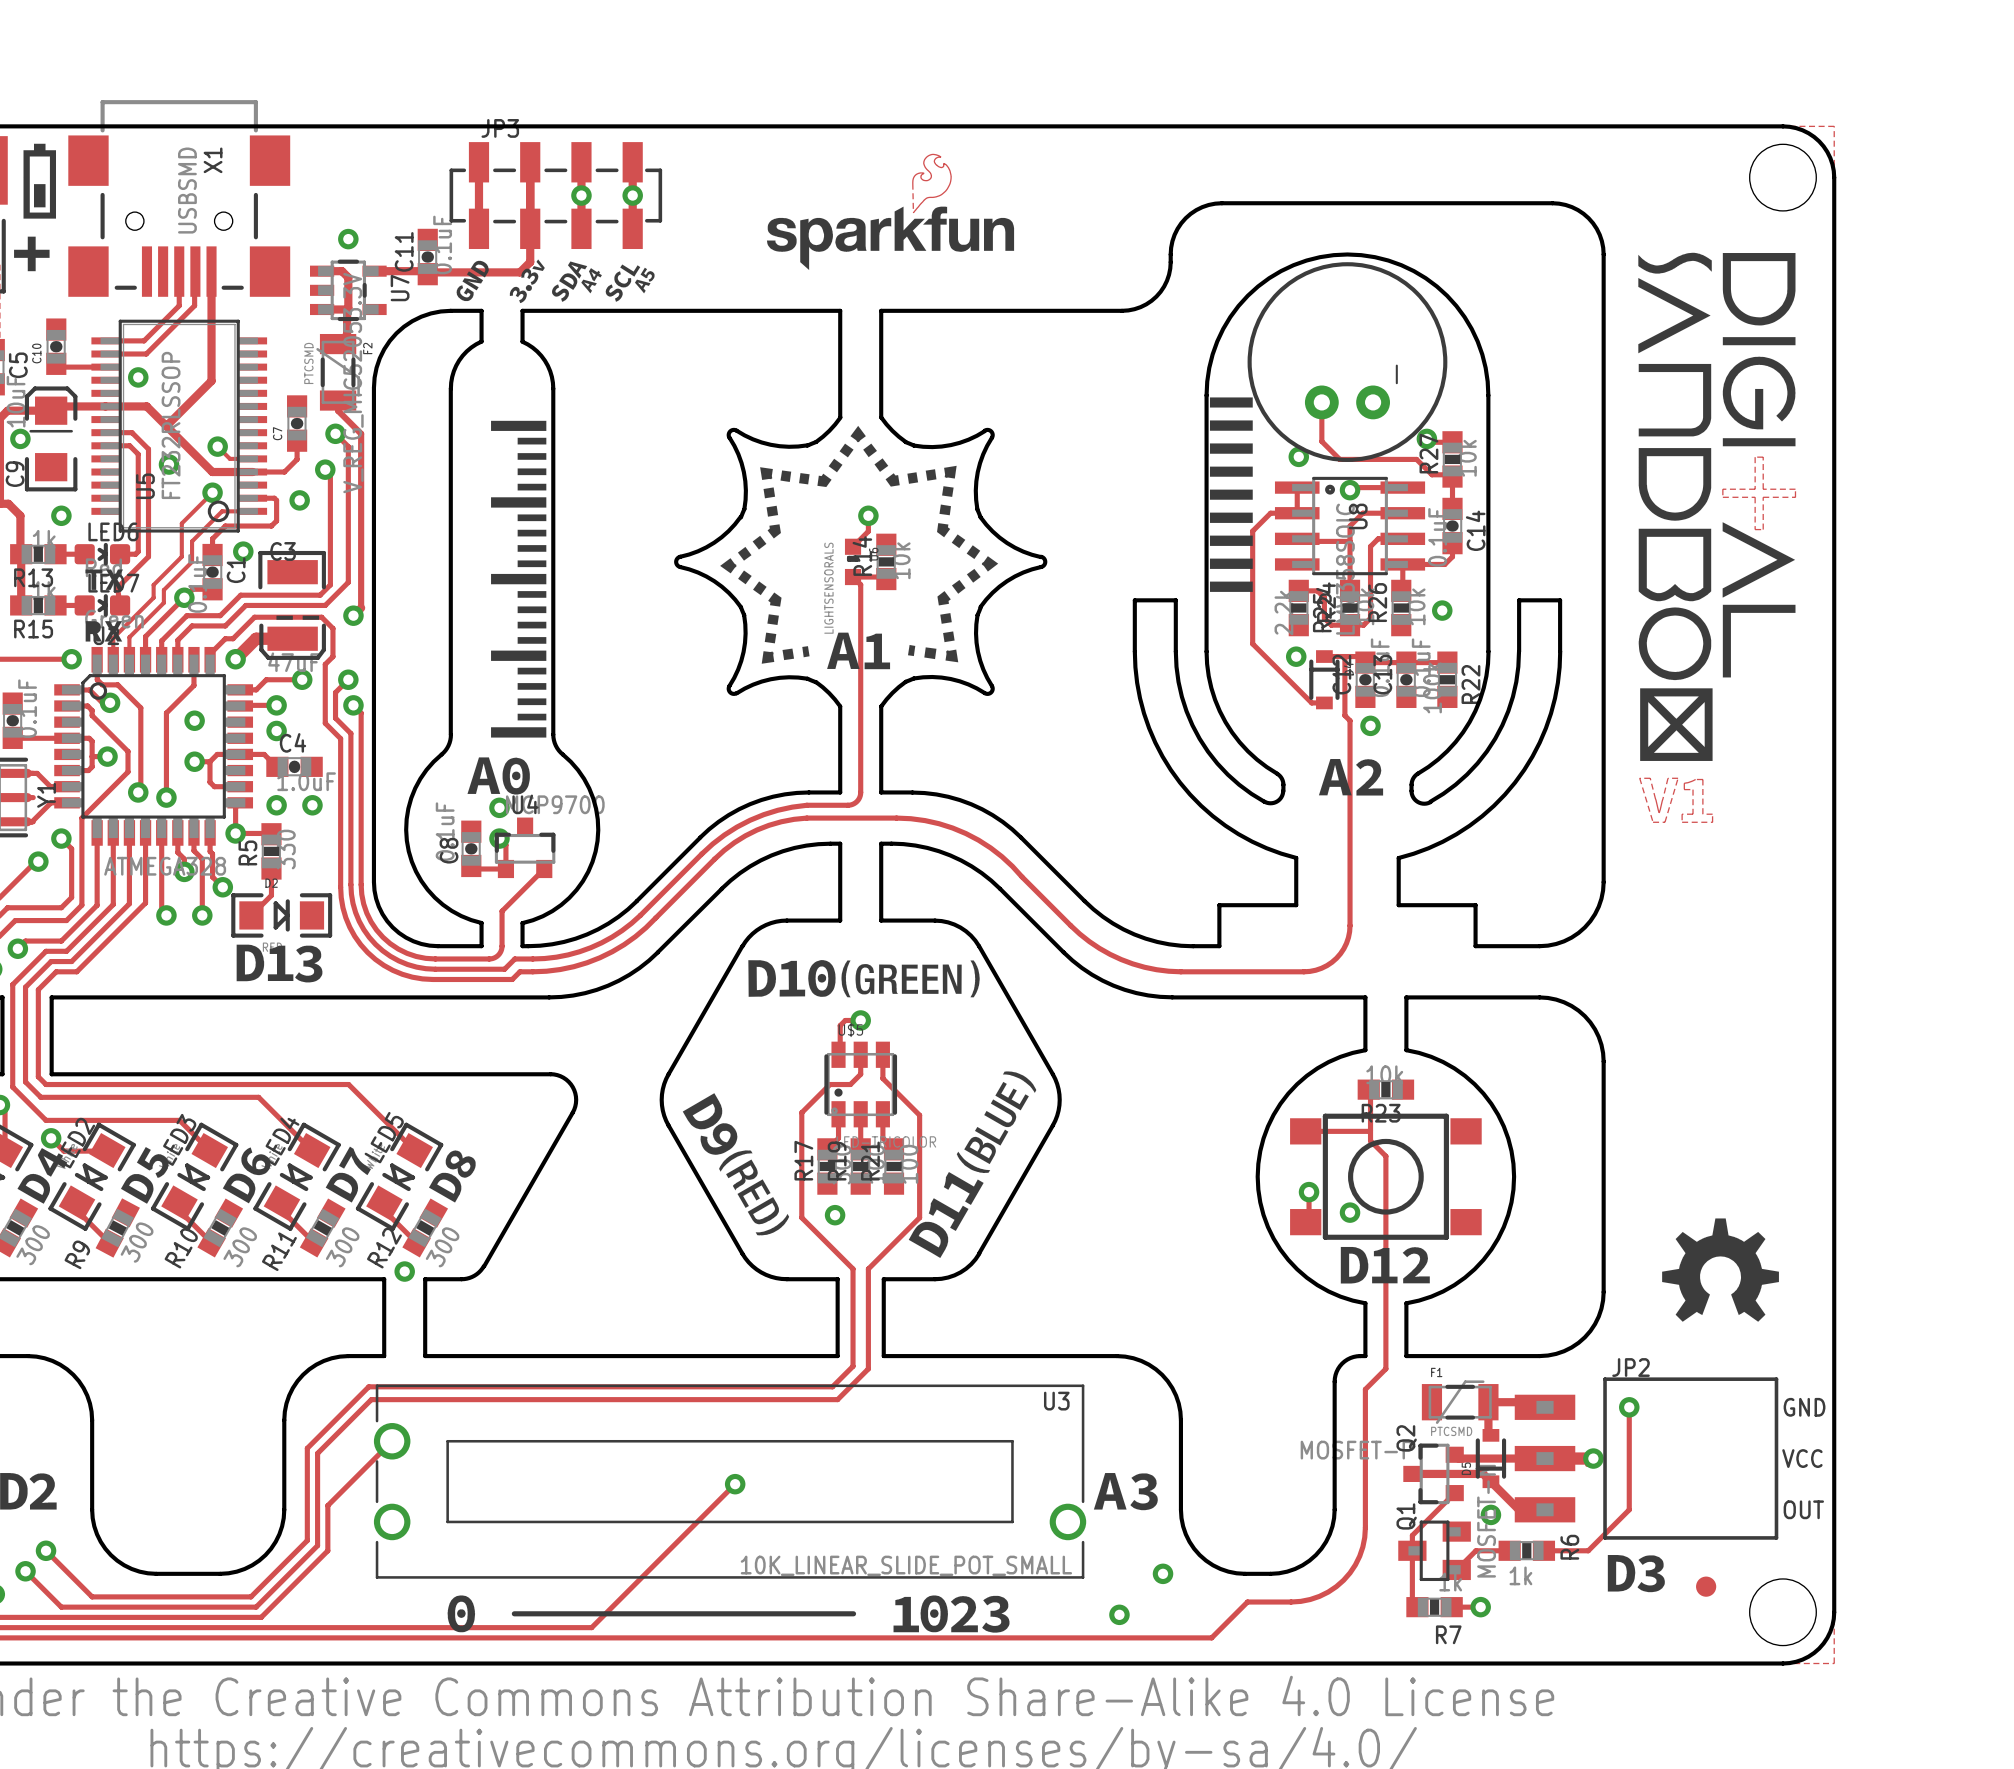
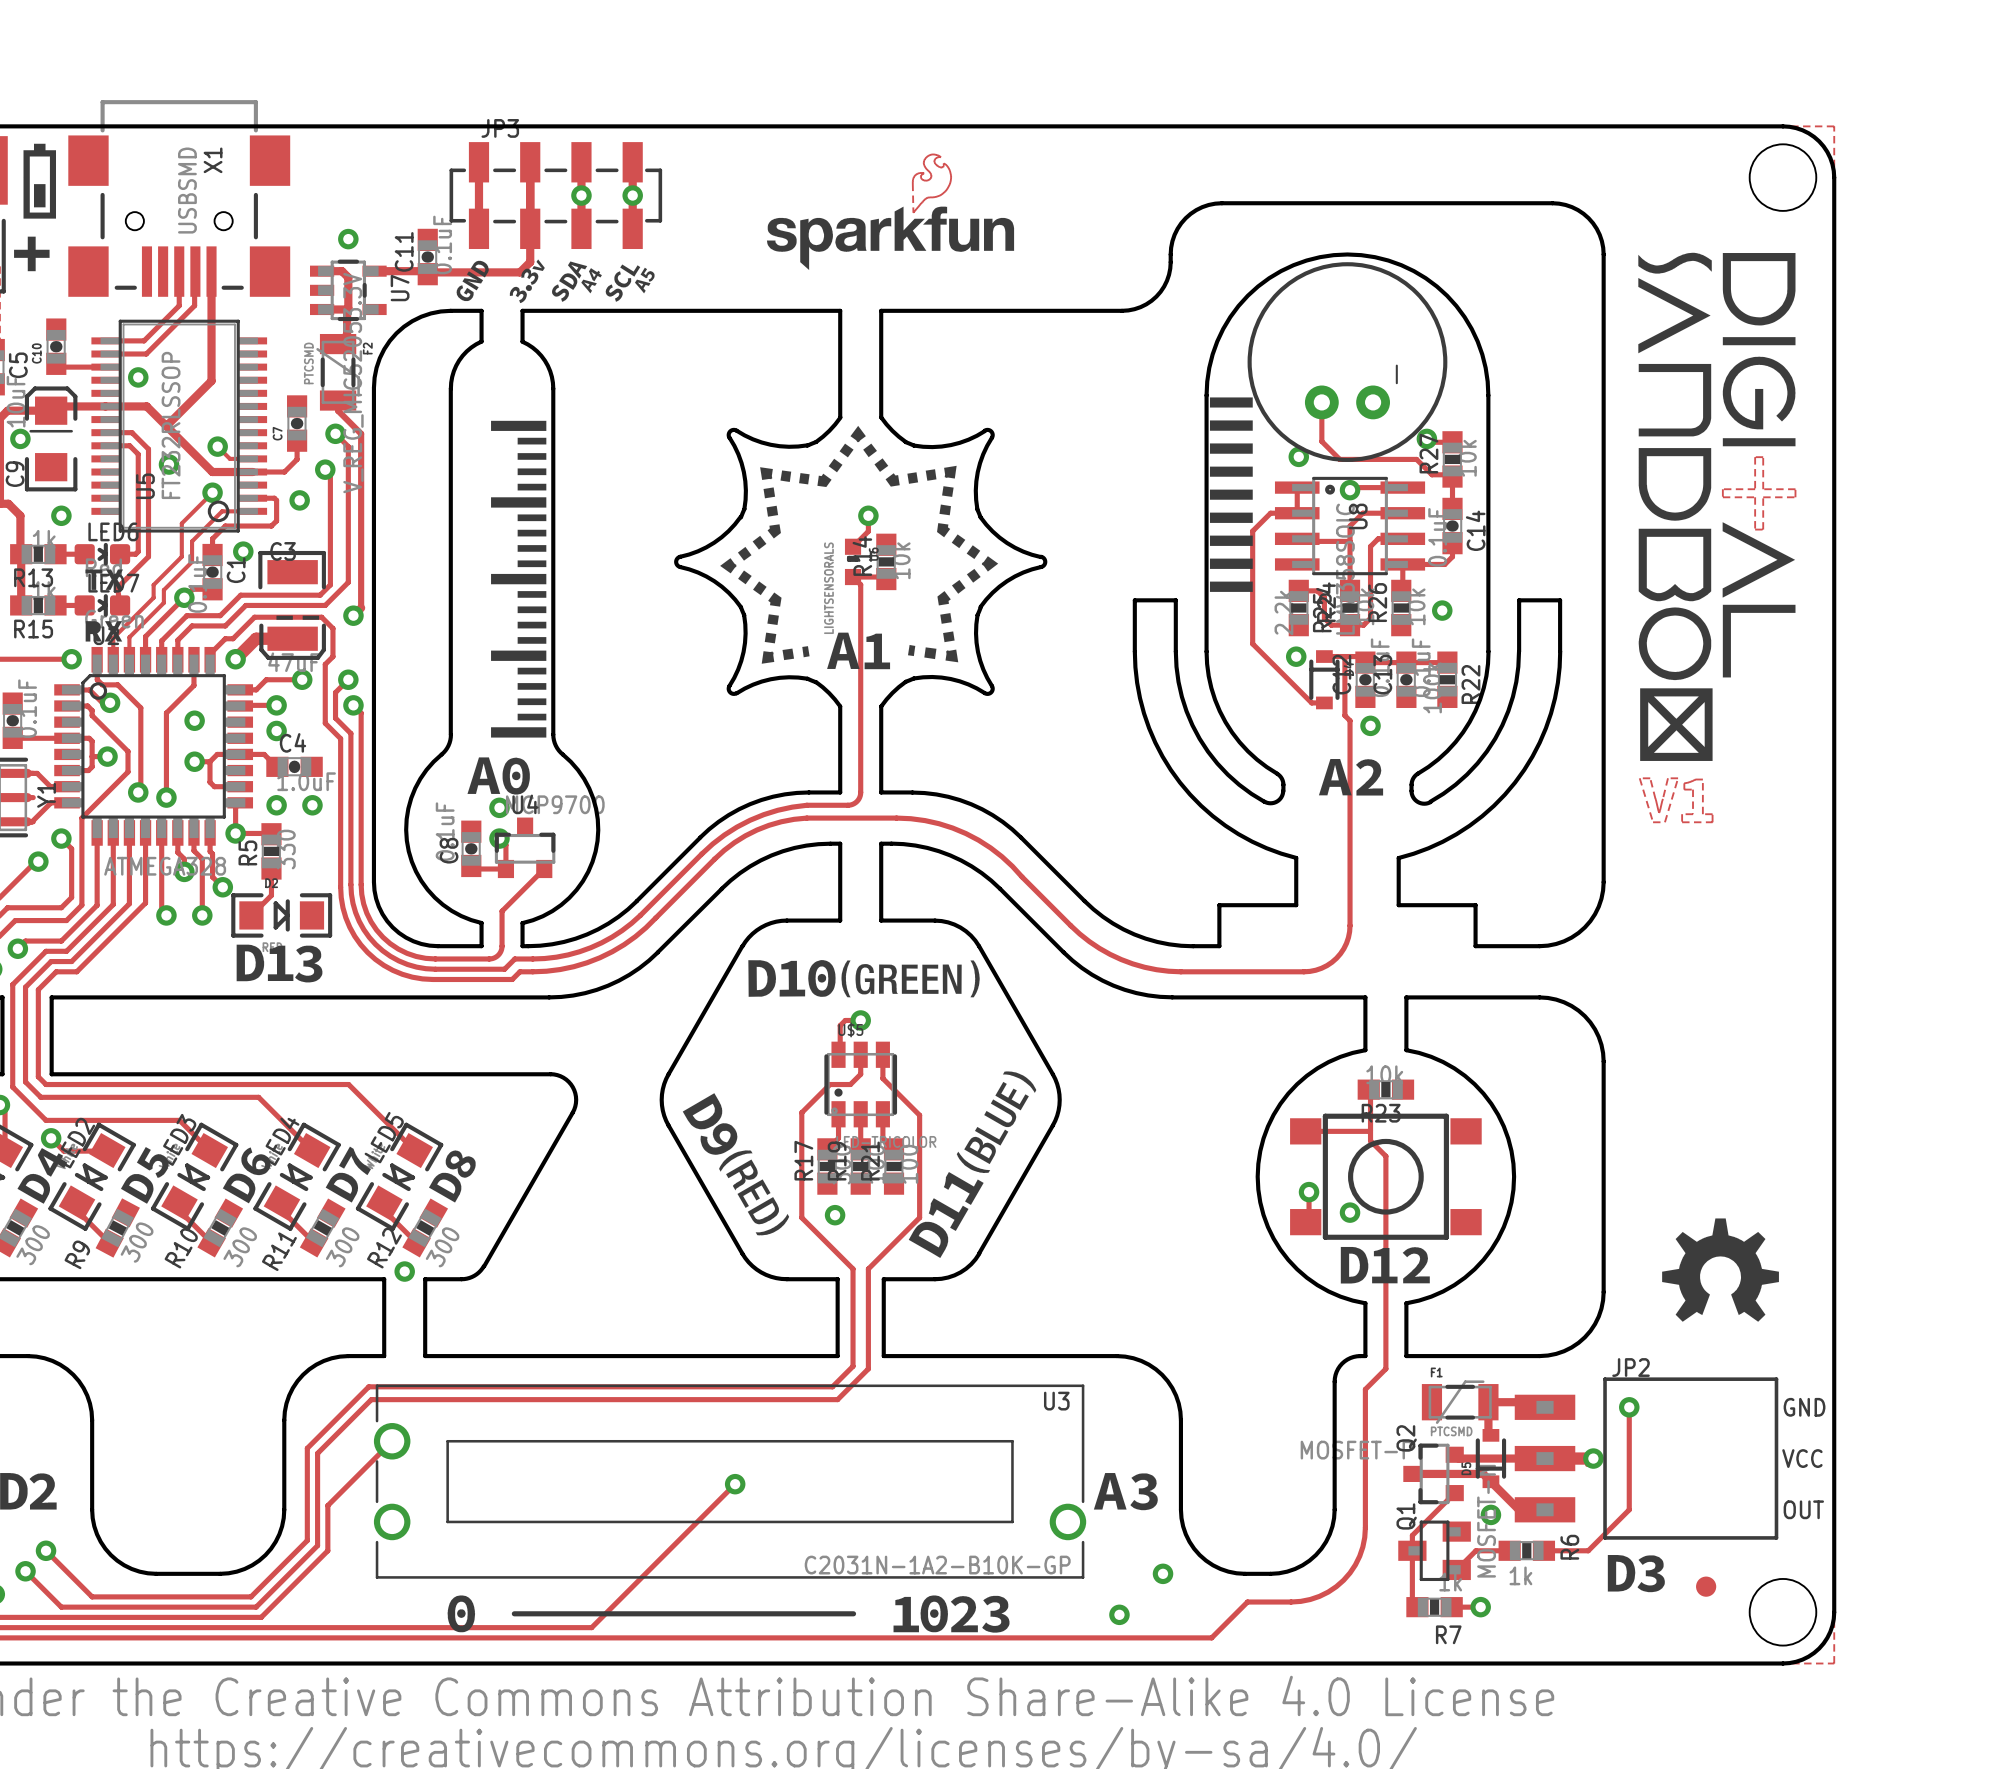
U3 value: 10K_LINEAR_SLIDE_POT_SMALL (906, 1565) -> C2031N-1A2-B10K-GP (937, 1565)

